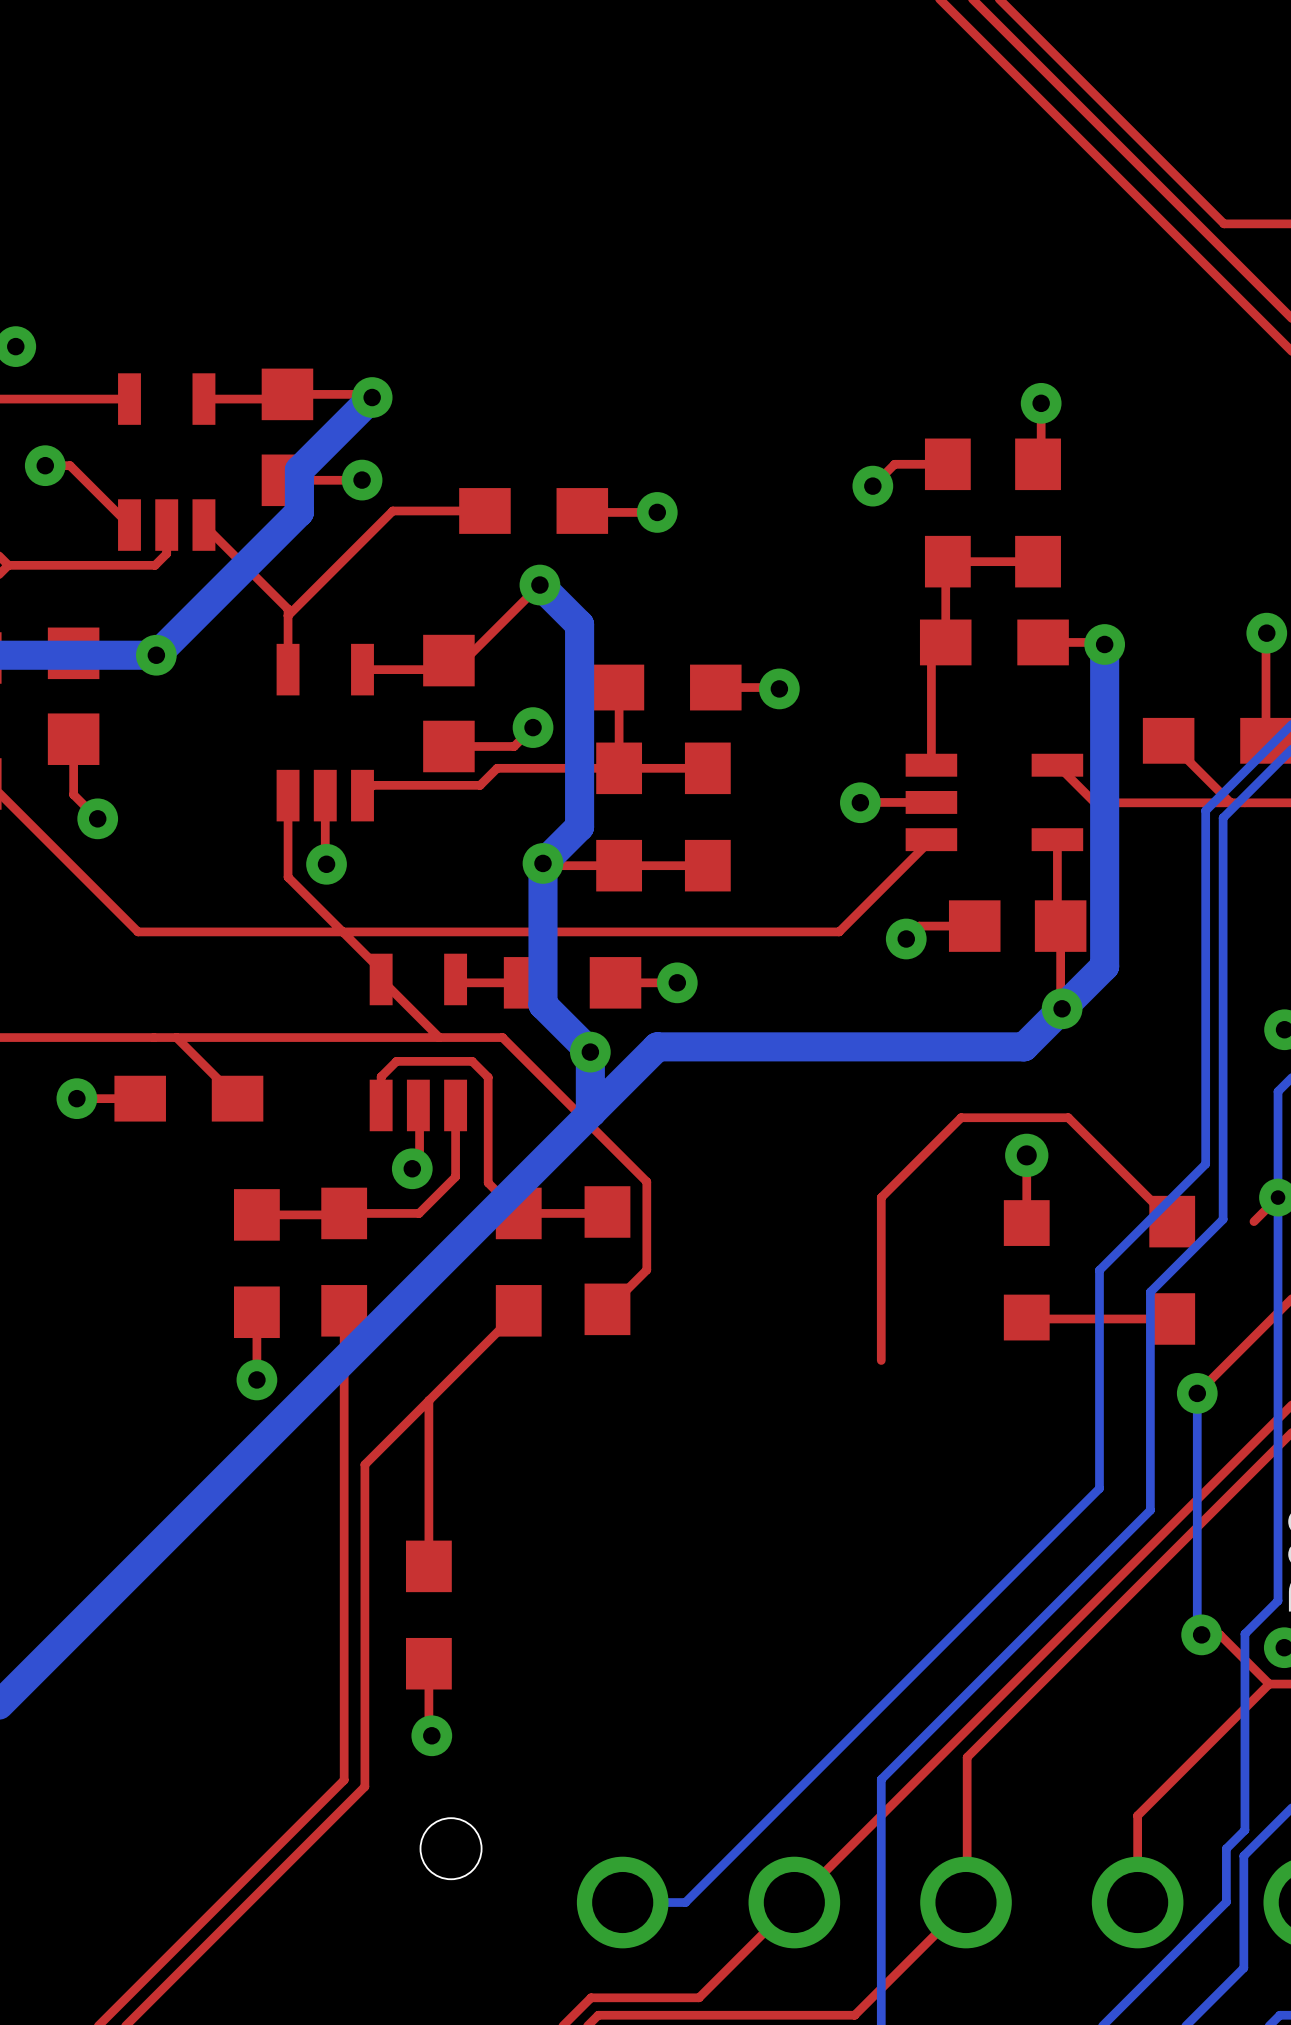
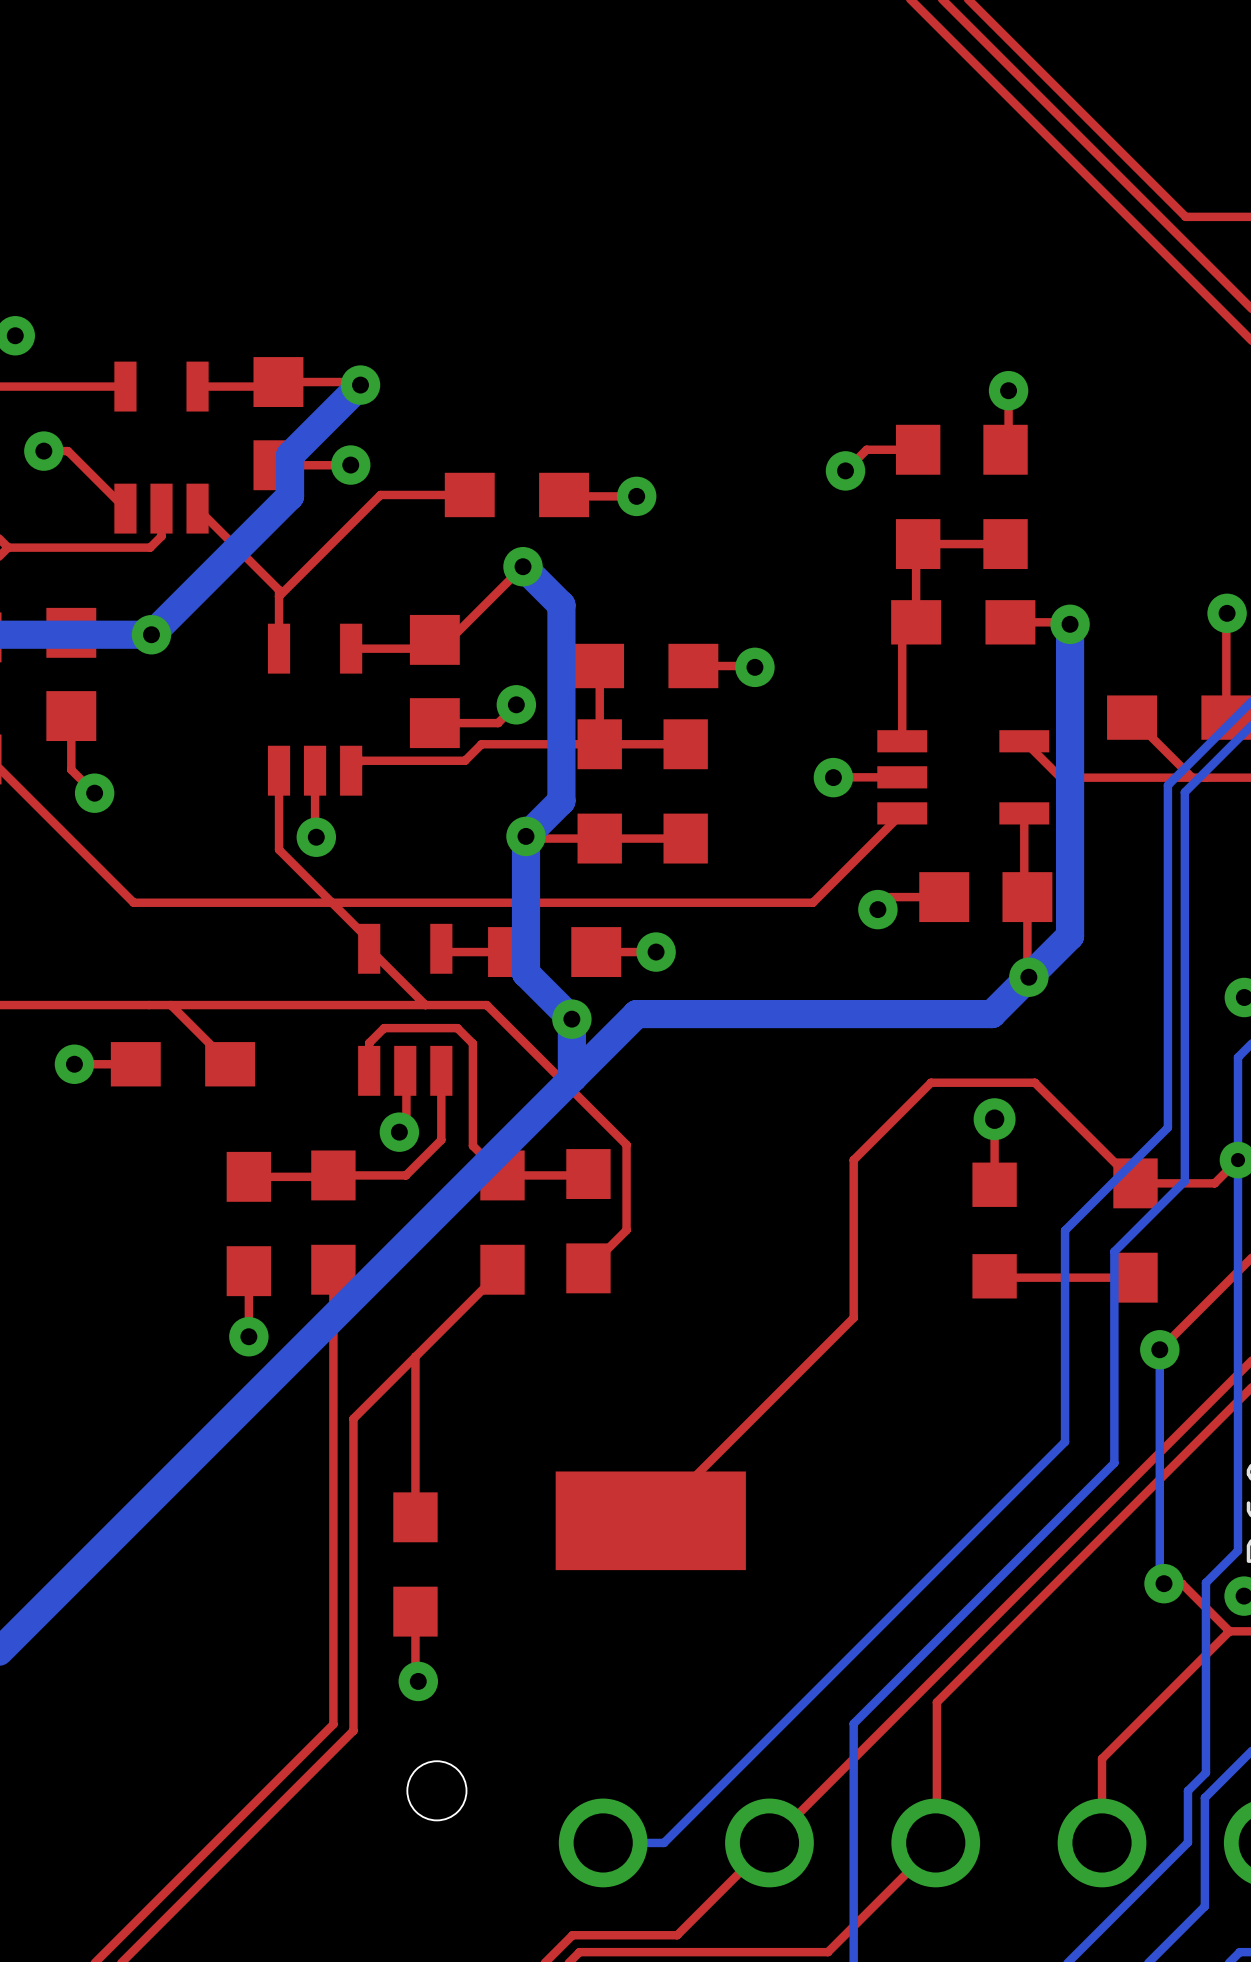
top track: none -> (1214, 1183) (1135, 1183)
top track: none -> (853, 1317) (650, 1520)
part: none -> (650, 1520)

